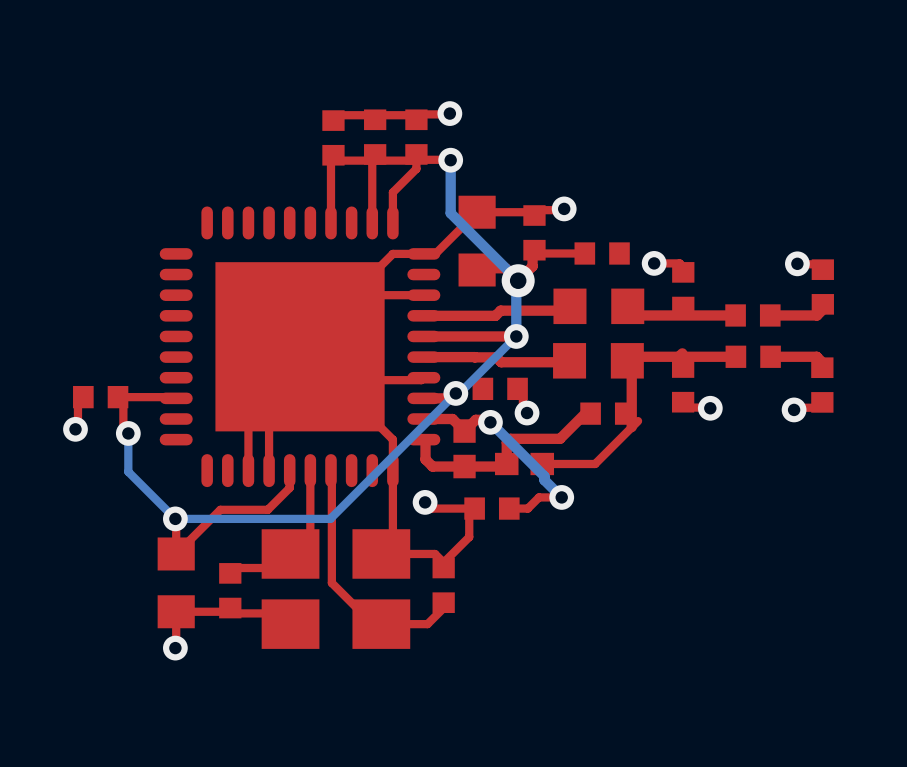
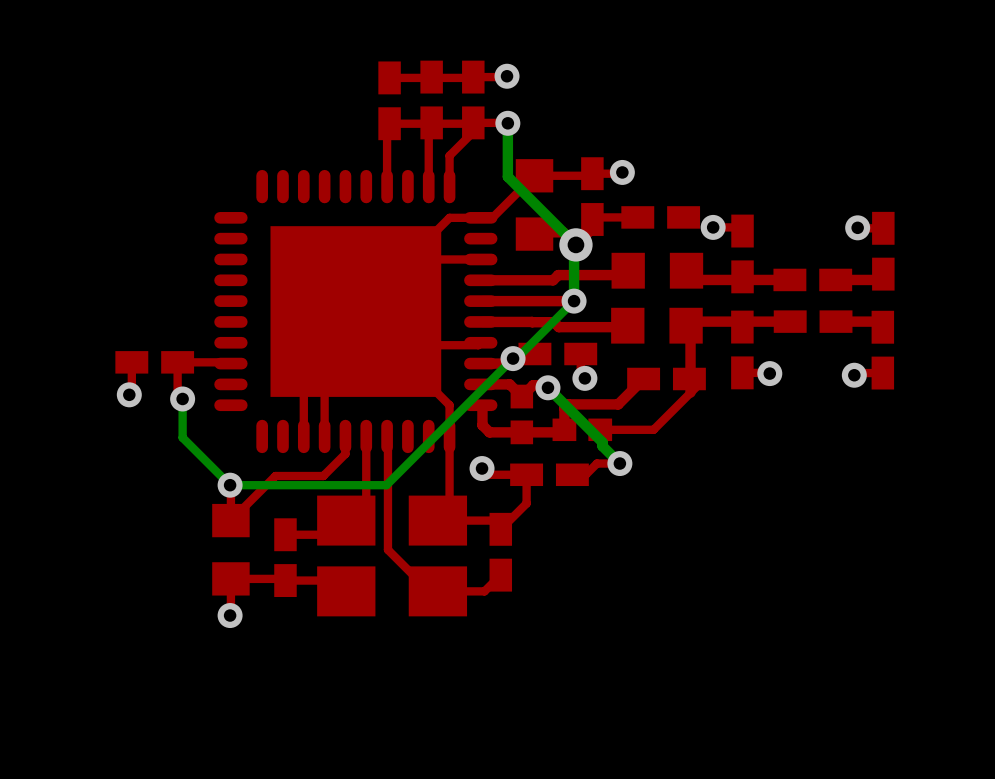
part footprint: [364, 109, 387, 165] -> [420, 60, 443, 140]
part footprint: [405, 109, 428, 165] -> [462, 60, 485, 140]
part footprint: [322, 110, 345, 166] -> [378, 61, 401, 141]
part footprint: [523, 205, 546, 261] -> [581, 157, 604, 236]
part footprint: [574, 242, 630, 265] -> [621, 206, 701, 229]
part footprint: [811, 259, 834, 315] -> [872, 211, 895, 291]
part footprint: [672, 262, 695, 318] -> [731, 214, 754, 294]
part footprint: [725, 304, 781, 327] -> [773, 268, 853, 292]
part footprint: [725, 345, 781, 368] -> [773, 310, 853, 333]
part footprint: [671, 357, 695, 413] -> [731, 310, 754, 390]
part footprint: [811, 357, 834, 413] -> [871, 310, 895, 390]
part footprint: [472, 377, 528, 401] -> [518, 342, 598, 366]
part footprint: [73, 385, 129, 409] -> [115, 351, 195, 374]
part footprint: [580, 402, 636, 425] -> [627, 367, 706, 391]
part footprint: [464, 497, 520, 520] -> [510, 463, 589, 487]
part footprint: [432, 557, 455, 614] -> [489, 512, 513, 592]
part footprint: [219, 563, 242, 619] -> [274, 518, 297, 598]

